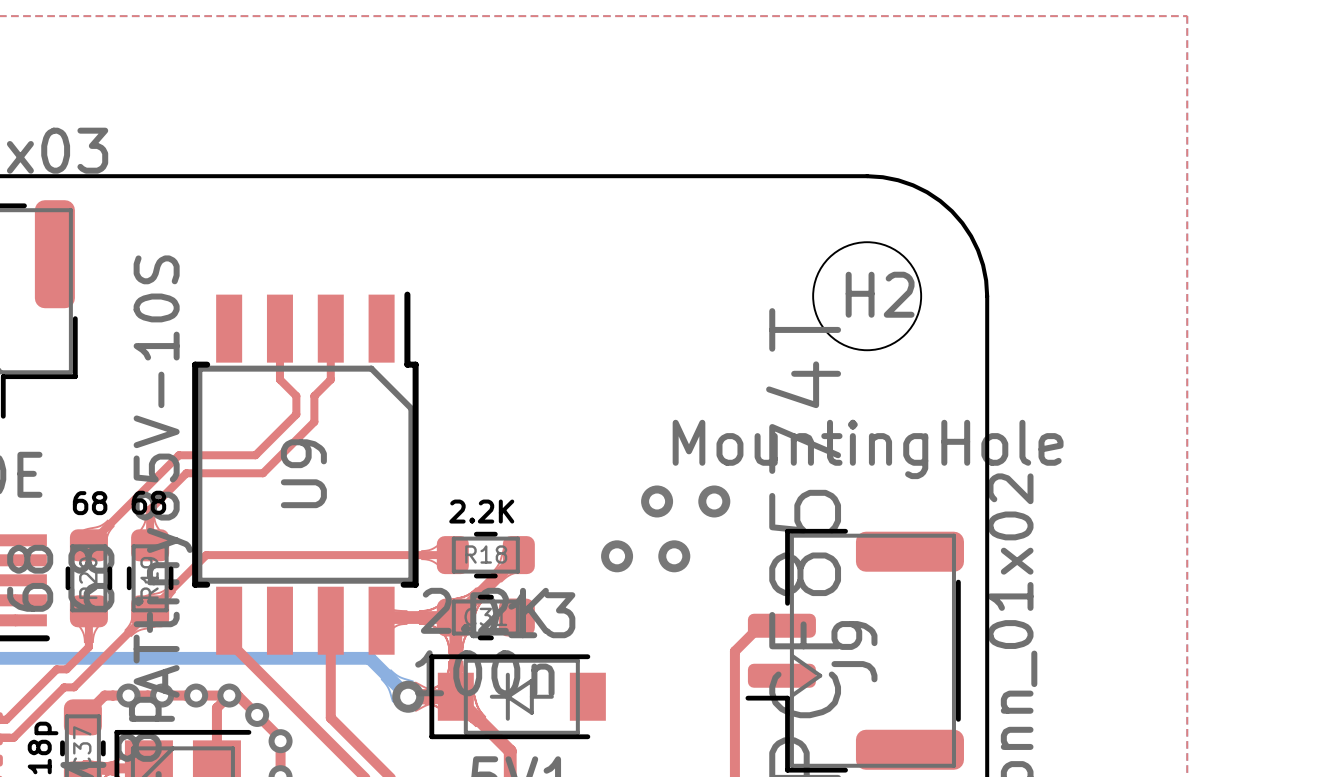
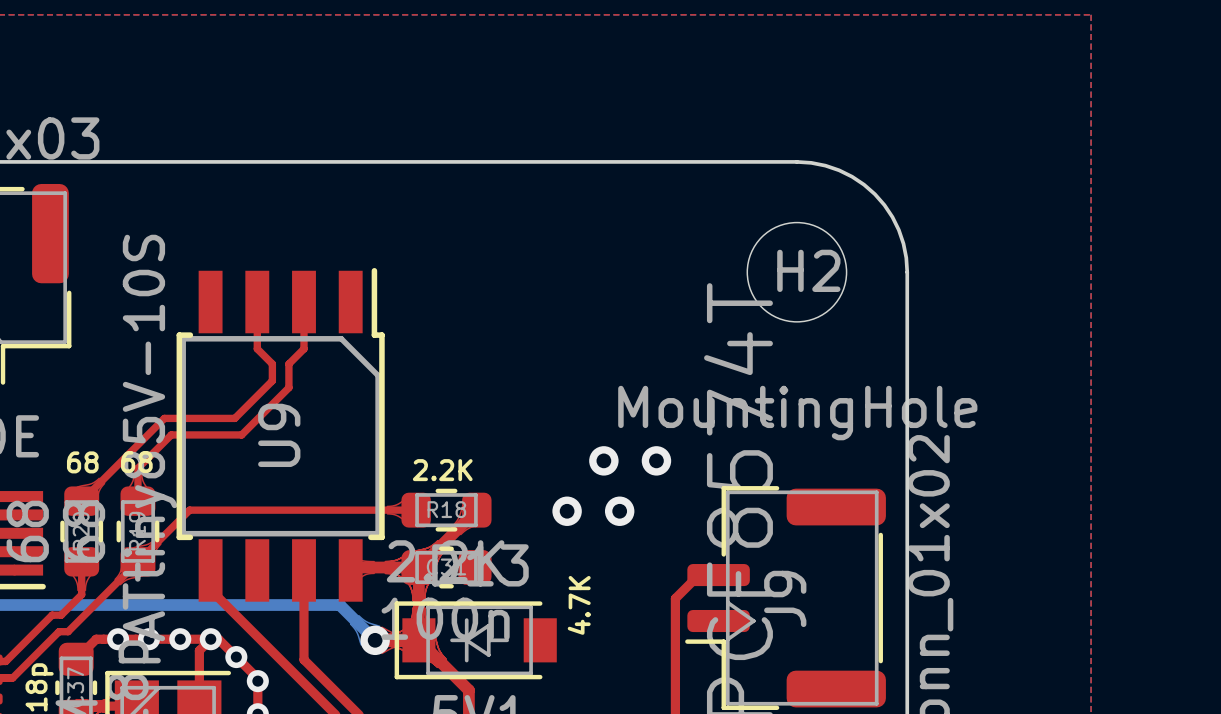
text: none -> 4.7K (579, 605)

